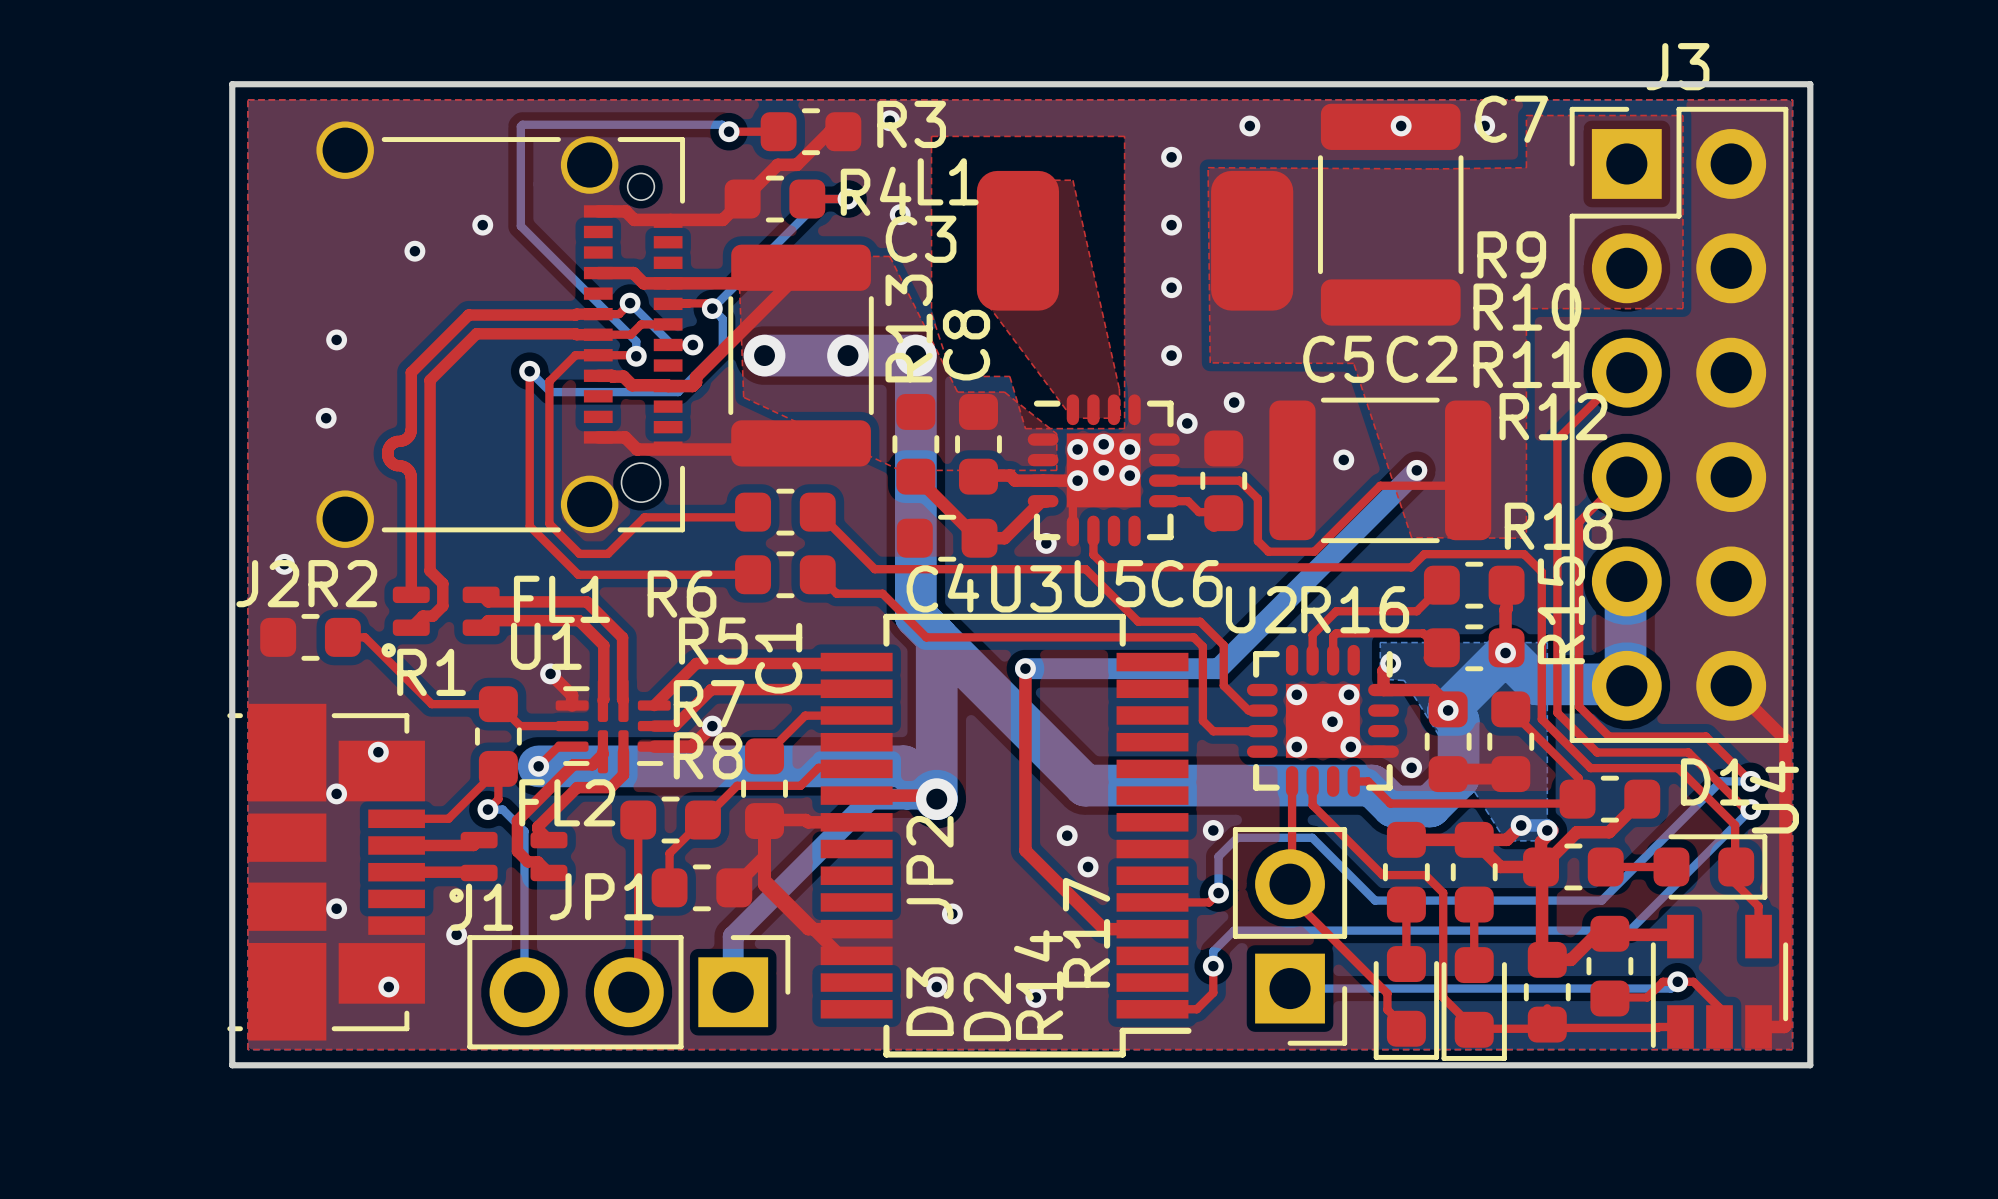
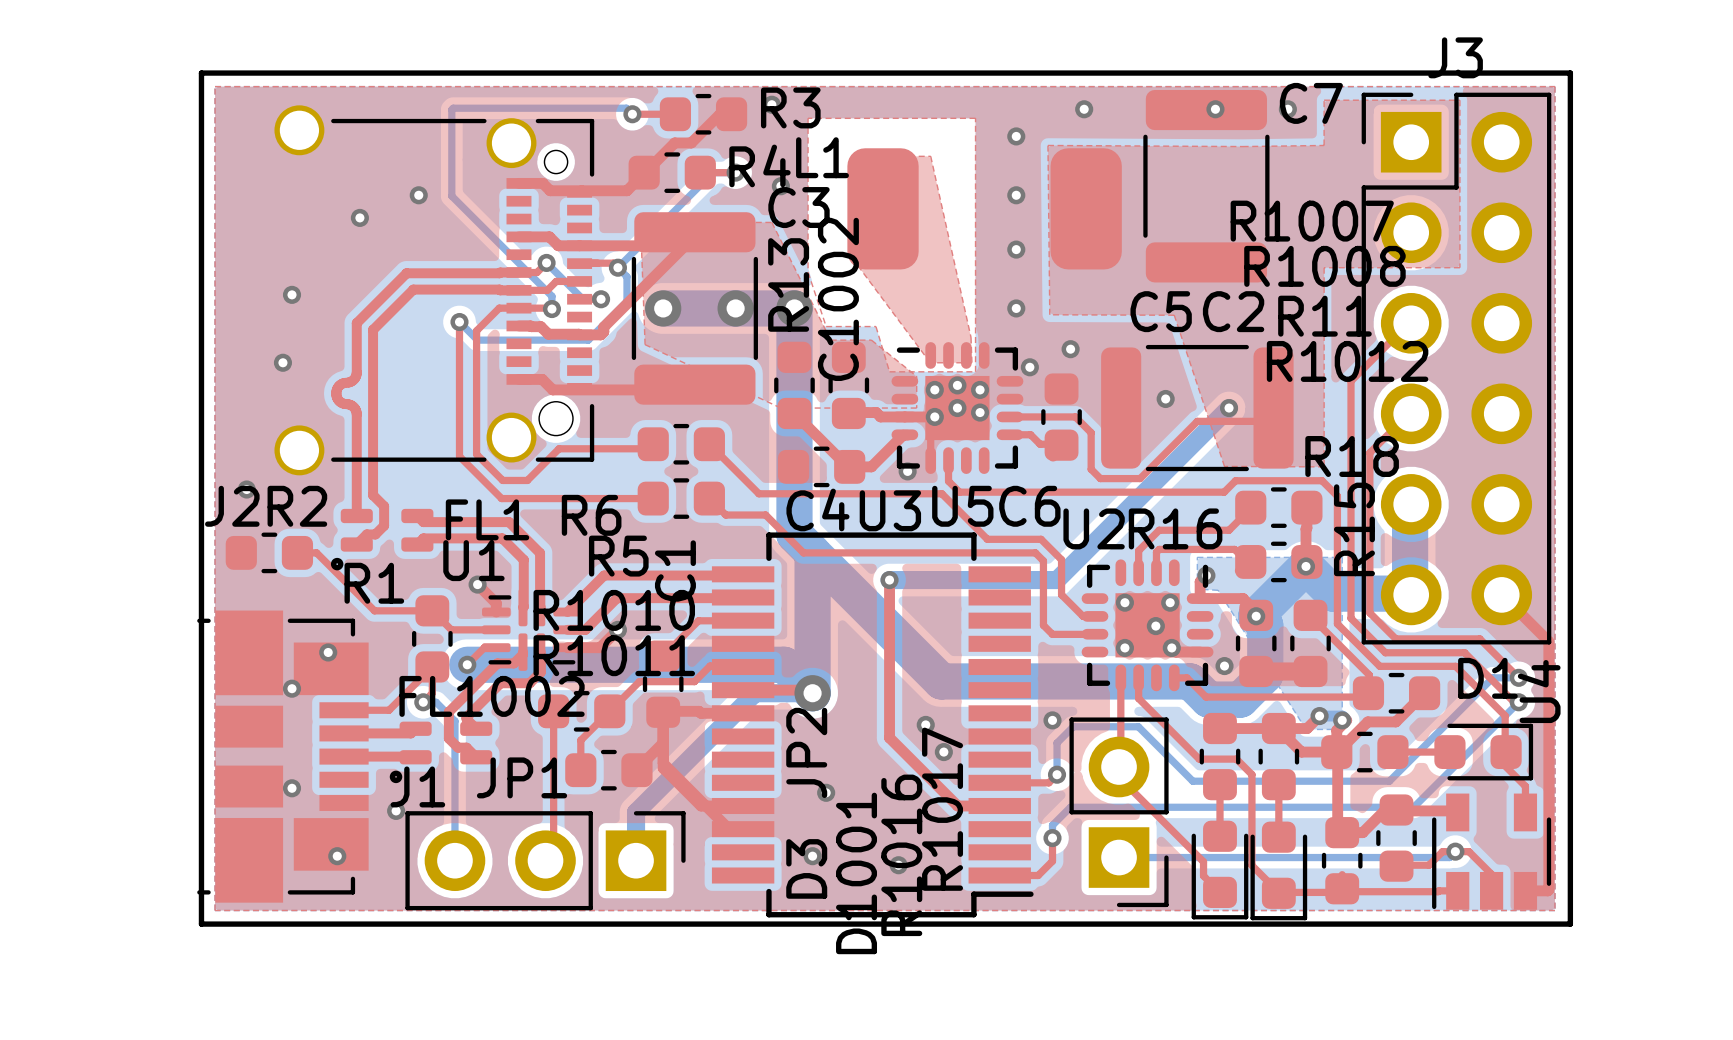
R9 name: R9 (1511, 254) -> R1007 (1312, 221)
R10 name: R10 (1527, 307) -> R1008 (1324, 266)
C8 name: C8 (966, 345) -> C1002 (838, 299)
R12 name: R12 (1553, 416) -> R1012 (1347, 361)
R7 name: R7 (709, 703) -> R1010 (614, 610)
R8 name: R8 (708, 755) -> R1011 (614, 655)
FL2 name: FL2 (567, 802) -> FL1002 (492, 696)
R17 name: R17 (1086, 932) -> R1017 (942, 809)
R14 name: R14 (1038, 985) -> R1016 (901, 855)
D2 name: D2 (987, 1006) -> D1001 (856, 873)

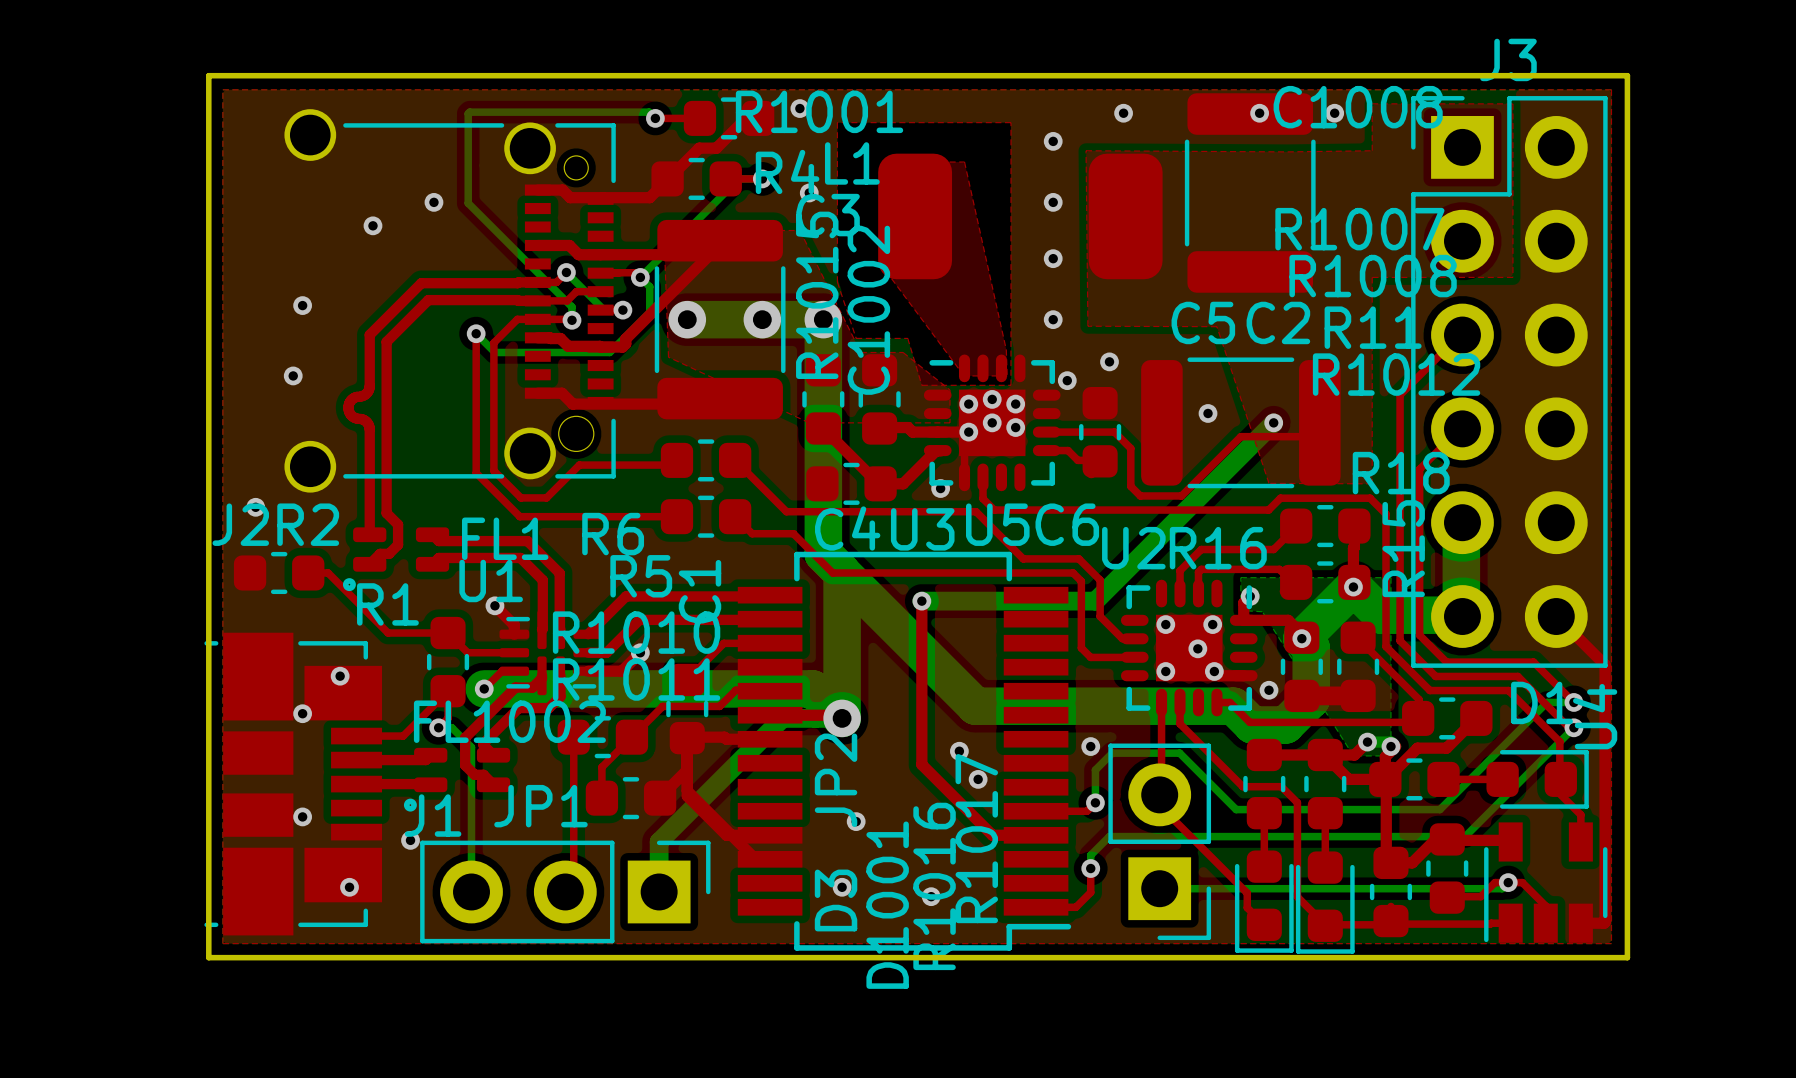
C7 name: C7 (1311, 103) -> C1008 (1358, 107)
R3 name: R3 (790, 107) -> R1001 (819, 111)
R13 name: R13 (788, 284) -> R1015 (817, 295)

